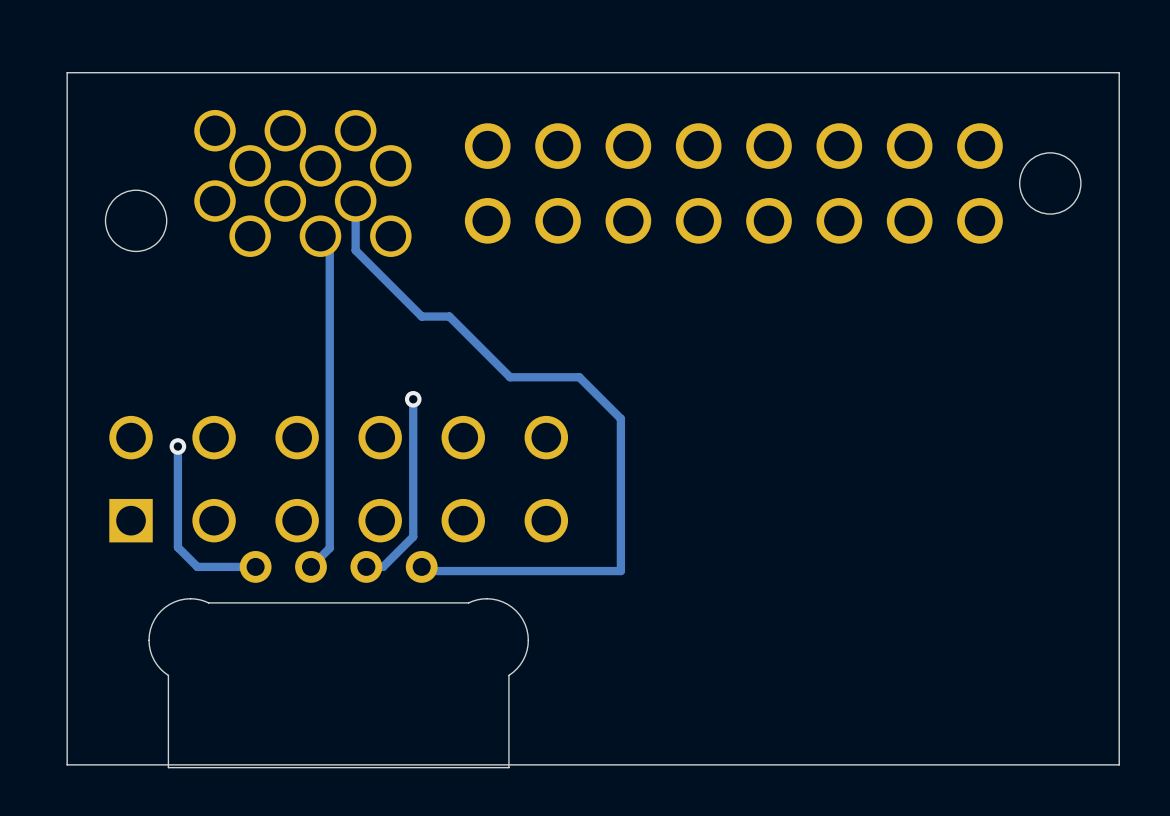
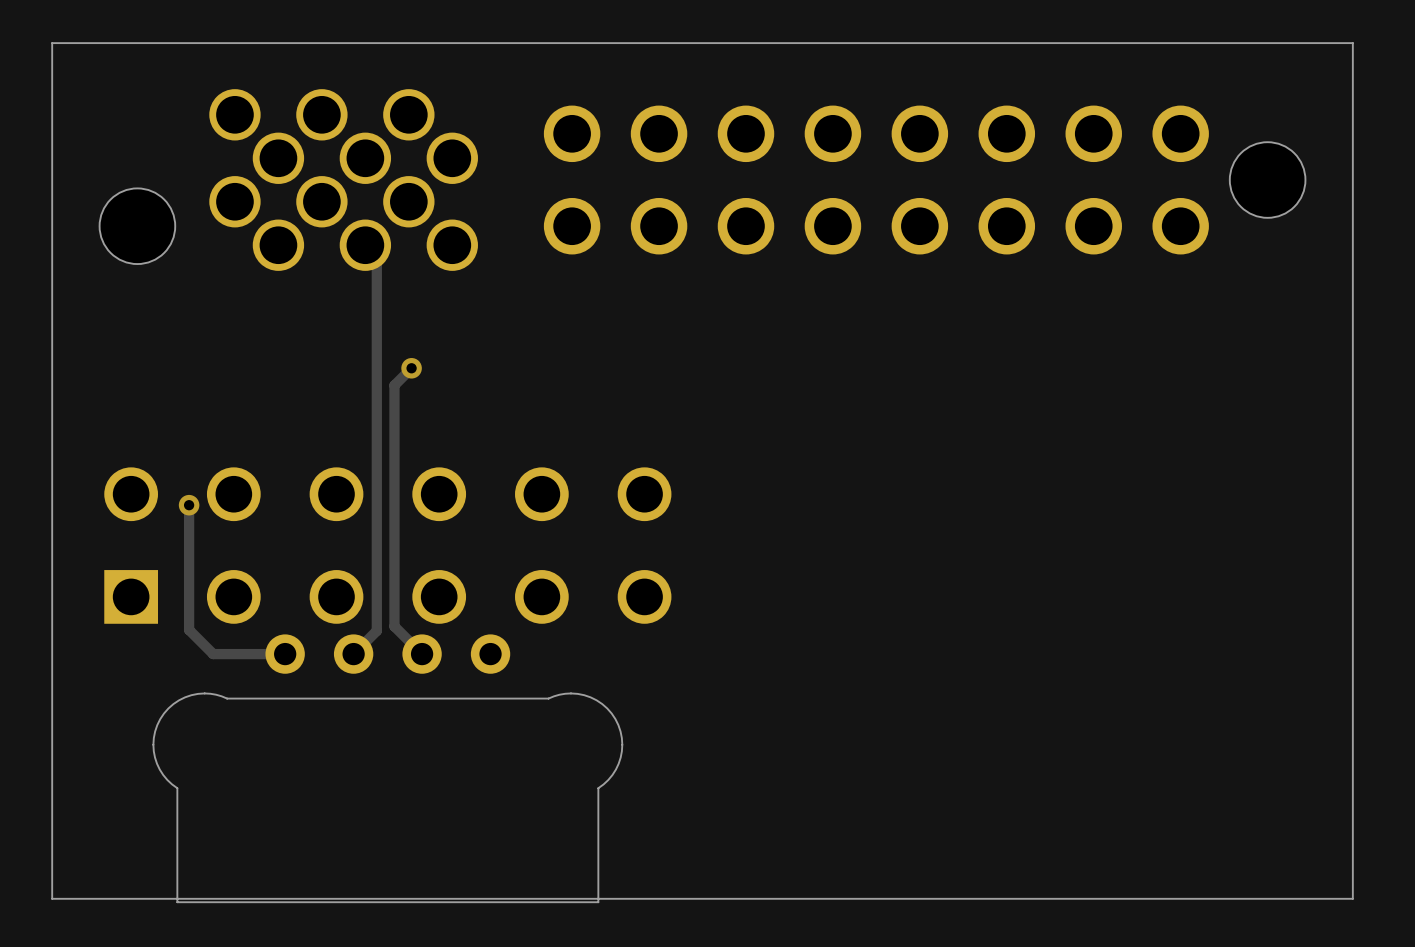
track: (355, 201) (355, 250) (421, 316) (449, 316) (510, 377) (579, 377) (620, 418) (620, 571) (417, 571) (413, 566) -> none
track: (413, 399) (413, 536) (383, 566) (366, 566) -> (411, 368) (394, 385) (394, 626) (422, 654)
via position: (413, 399) -> (411, 368)

